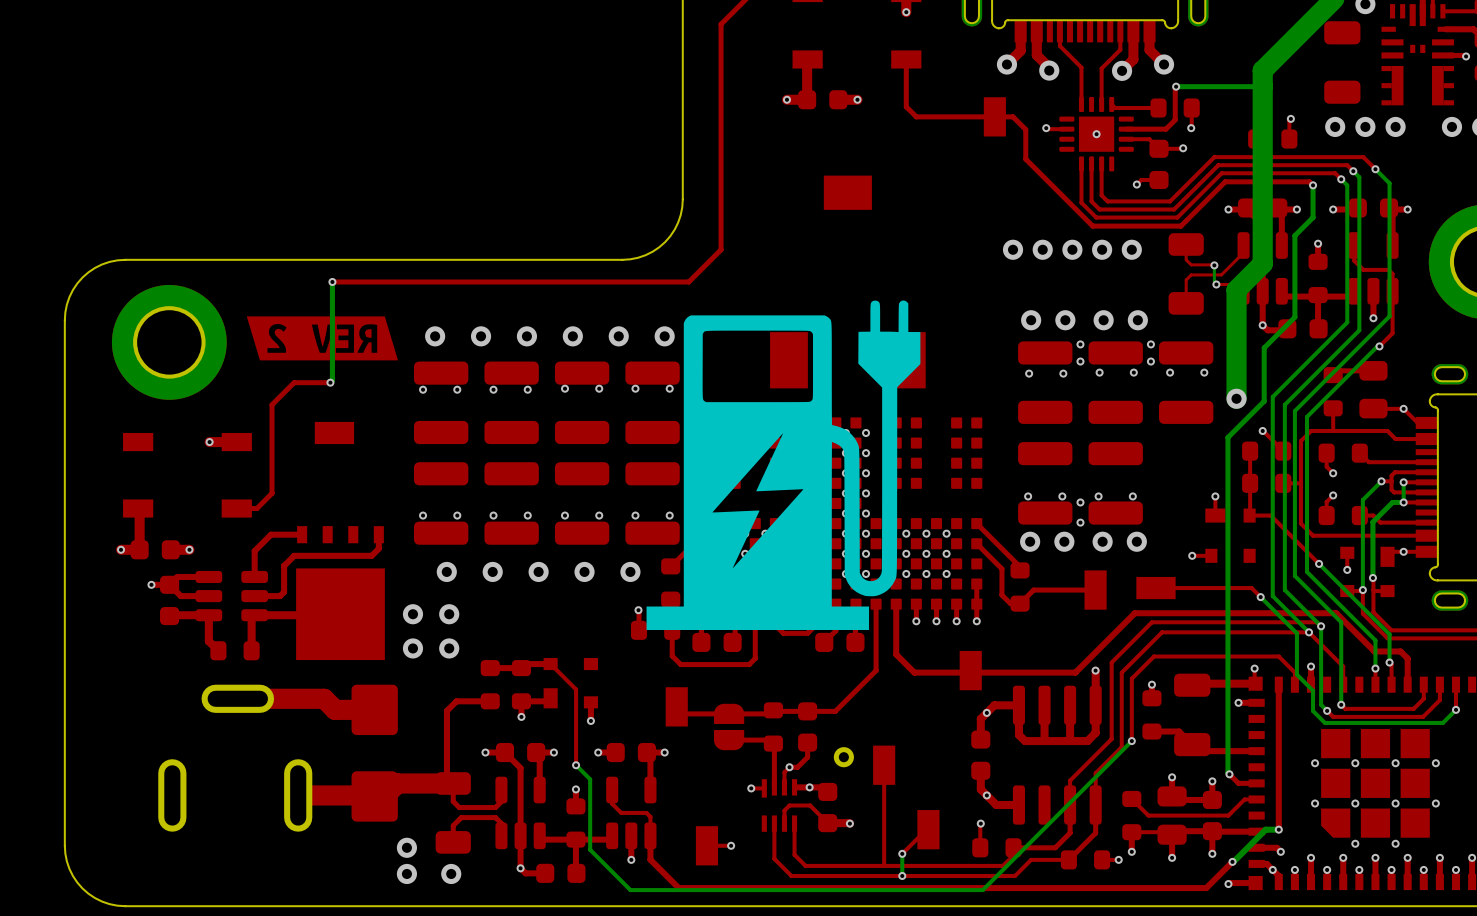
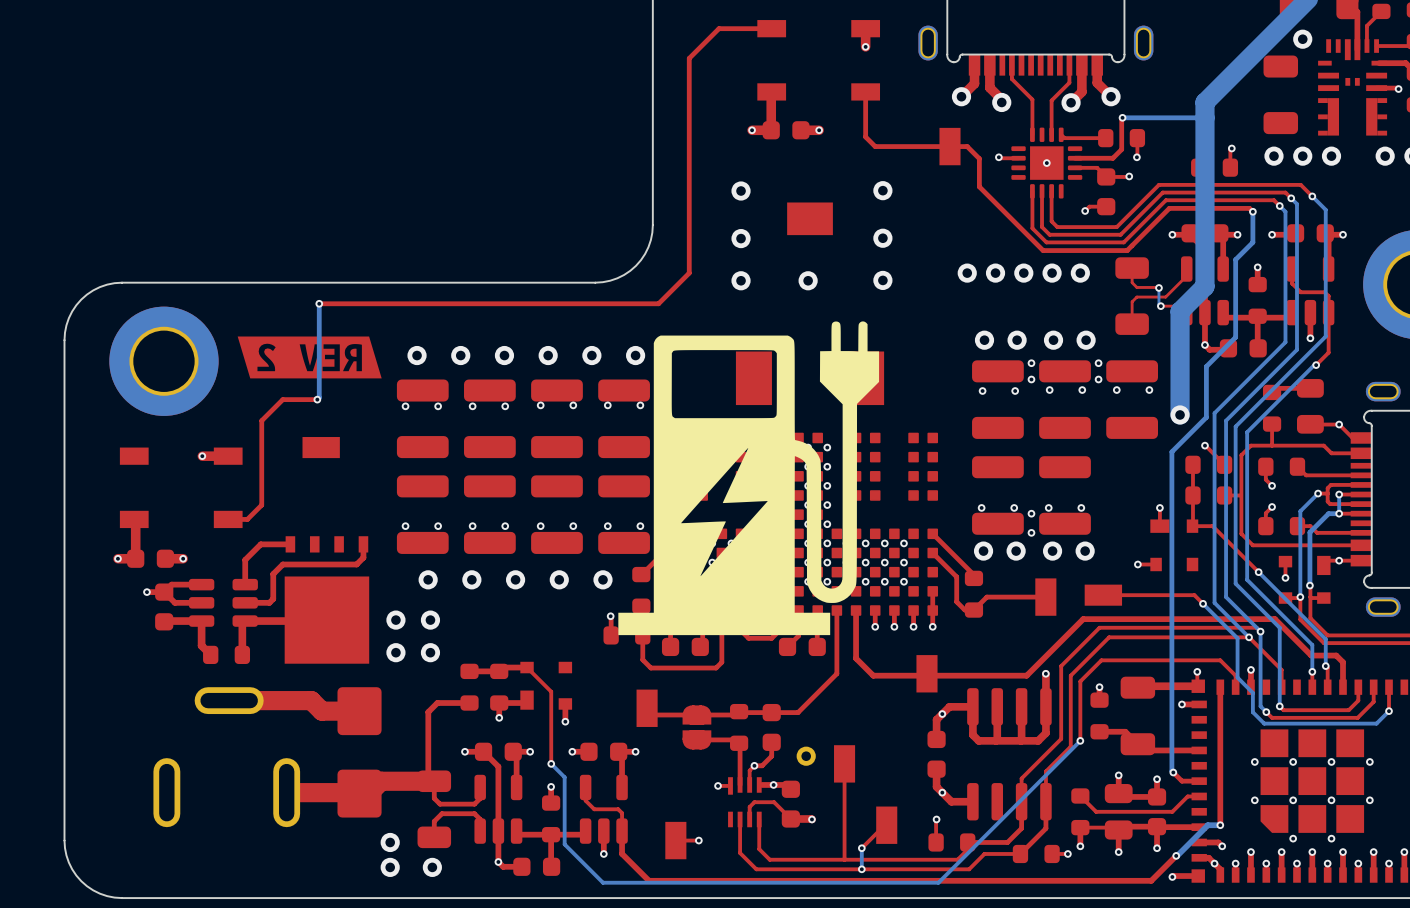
via: none -> (741, 191)
via: none -> (882, 190)
via: none -> (741, 238)
via: none -> (882, 238)
via: none -> (741, 280)
via: none -> (808, 280)
via: none -> (882, 280)

